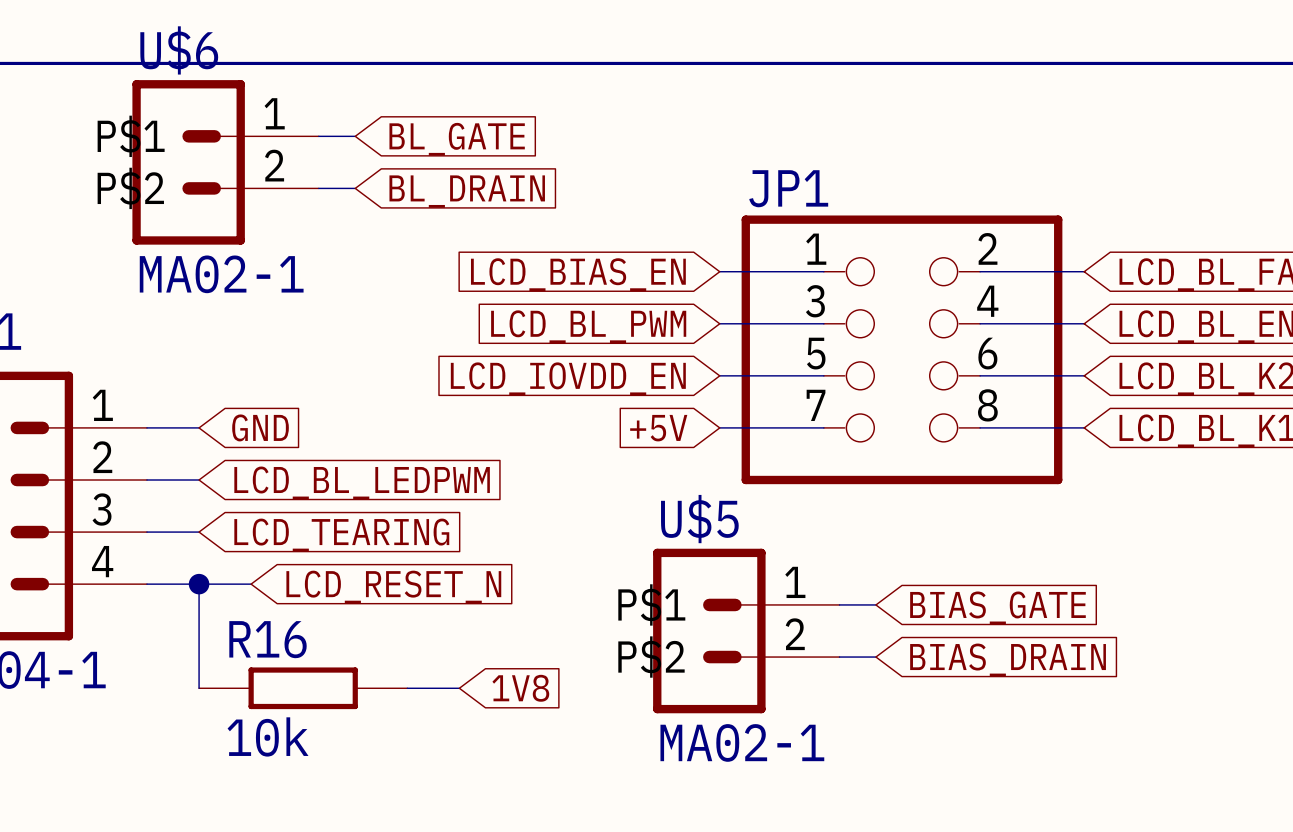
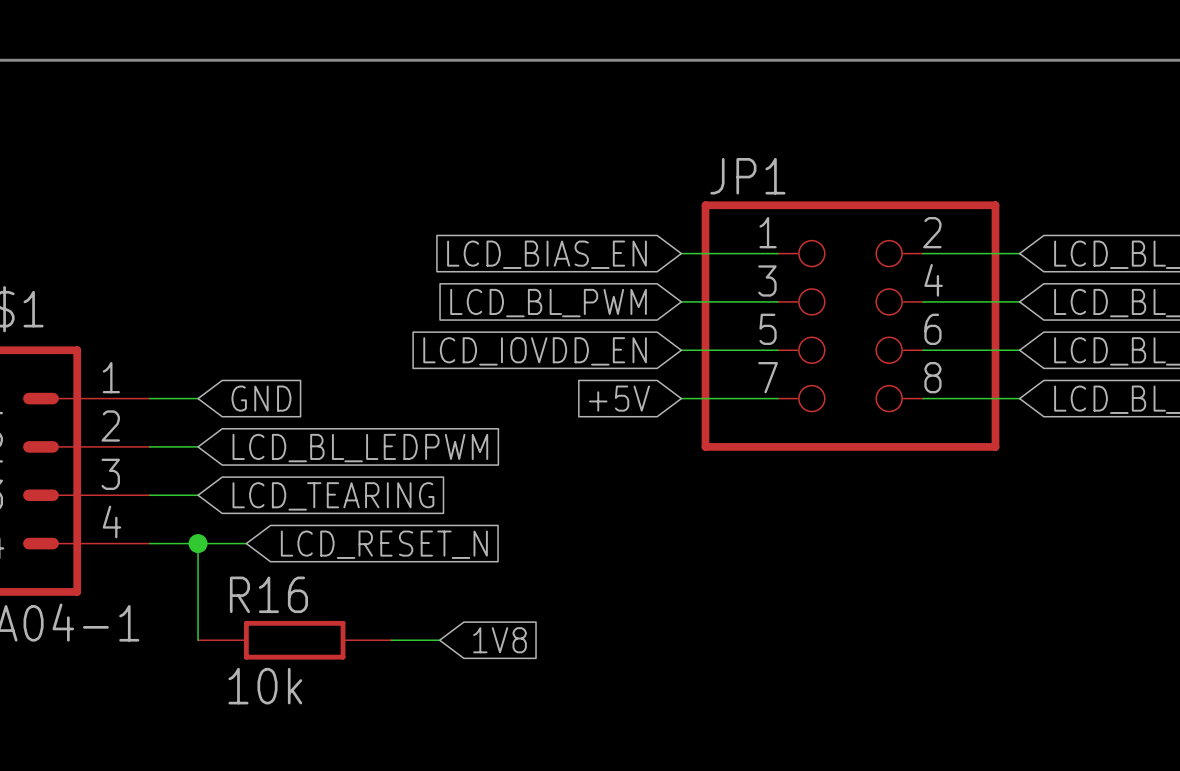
wire: (318, 136) (355, 136) -> none
global label: BL_GATE (457, 139) -> none
U$6: MA02-1 (225, 162) -> none
wire: (318, 188) (355, 188) -> none
global label: BL_DRAIN (467, 191) -> none
wire: (839, 604) (875, 604) -> none
global label: BIAS_GATE (997, 607) -> none
U$5: MA02-1 (746, 631) -> none
wire: (839, 657) (875, 657) -> none
global label: BIAS_DRAIN (1008, 659) -> none

